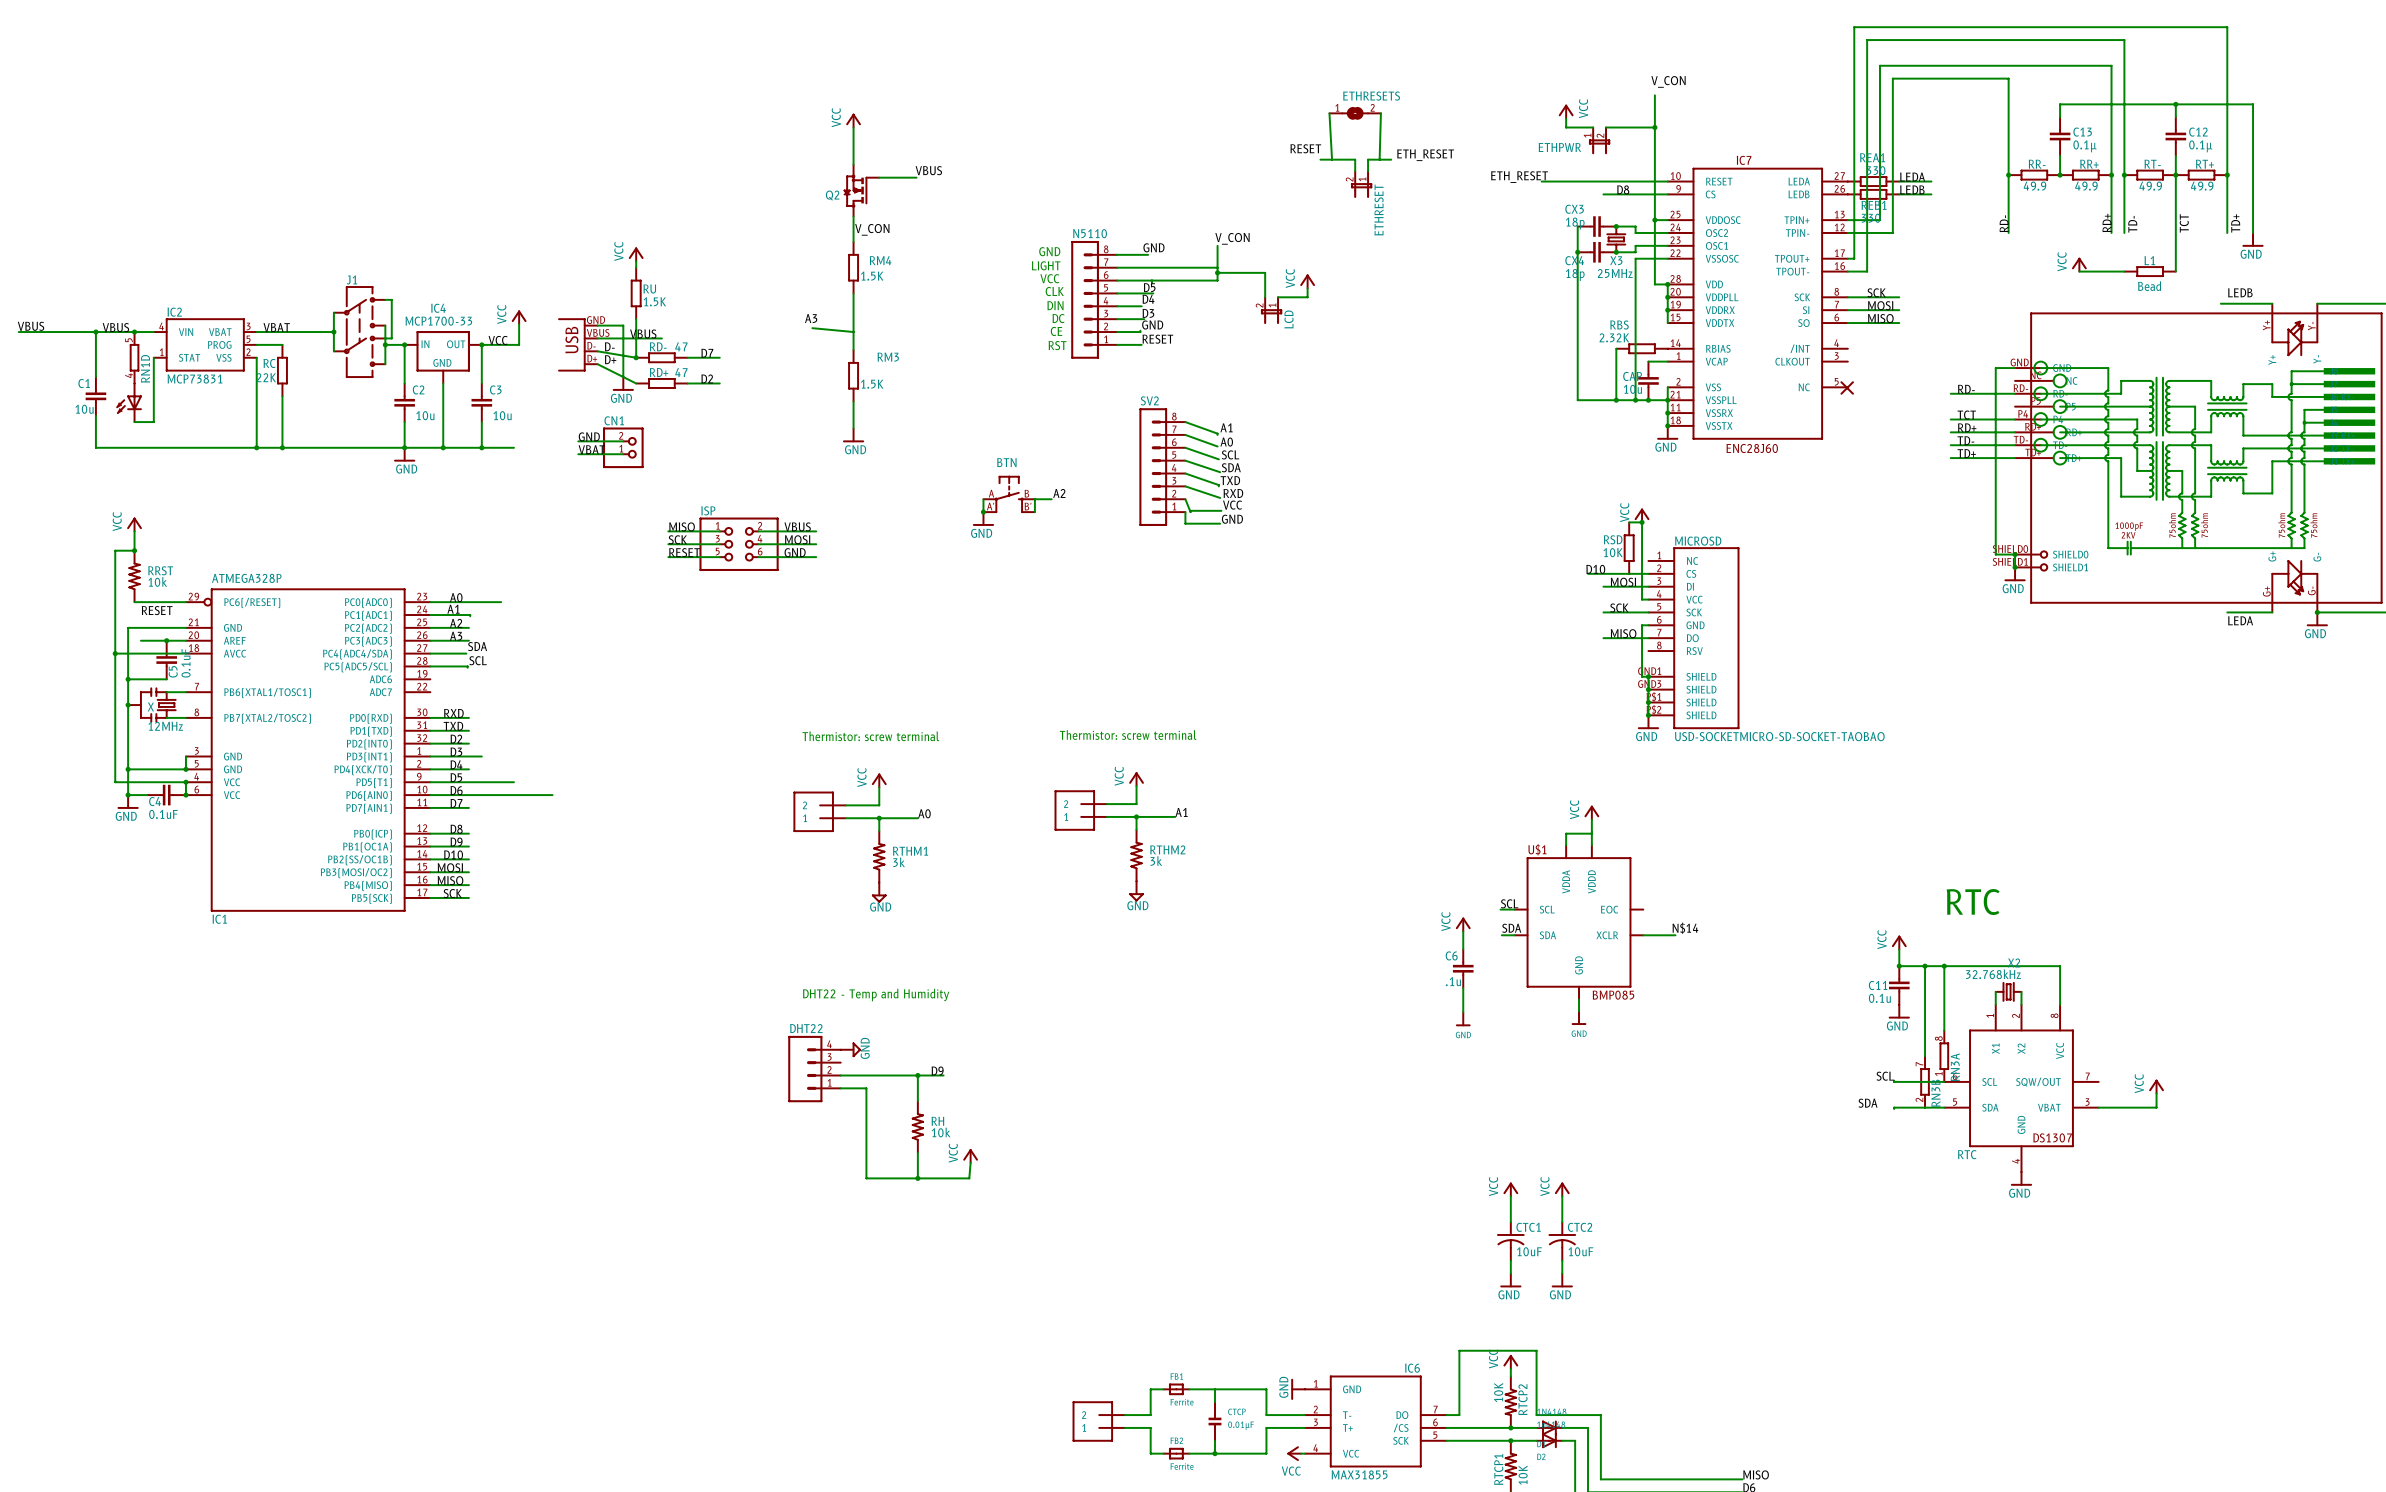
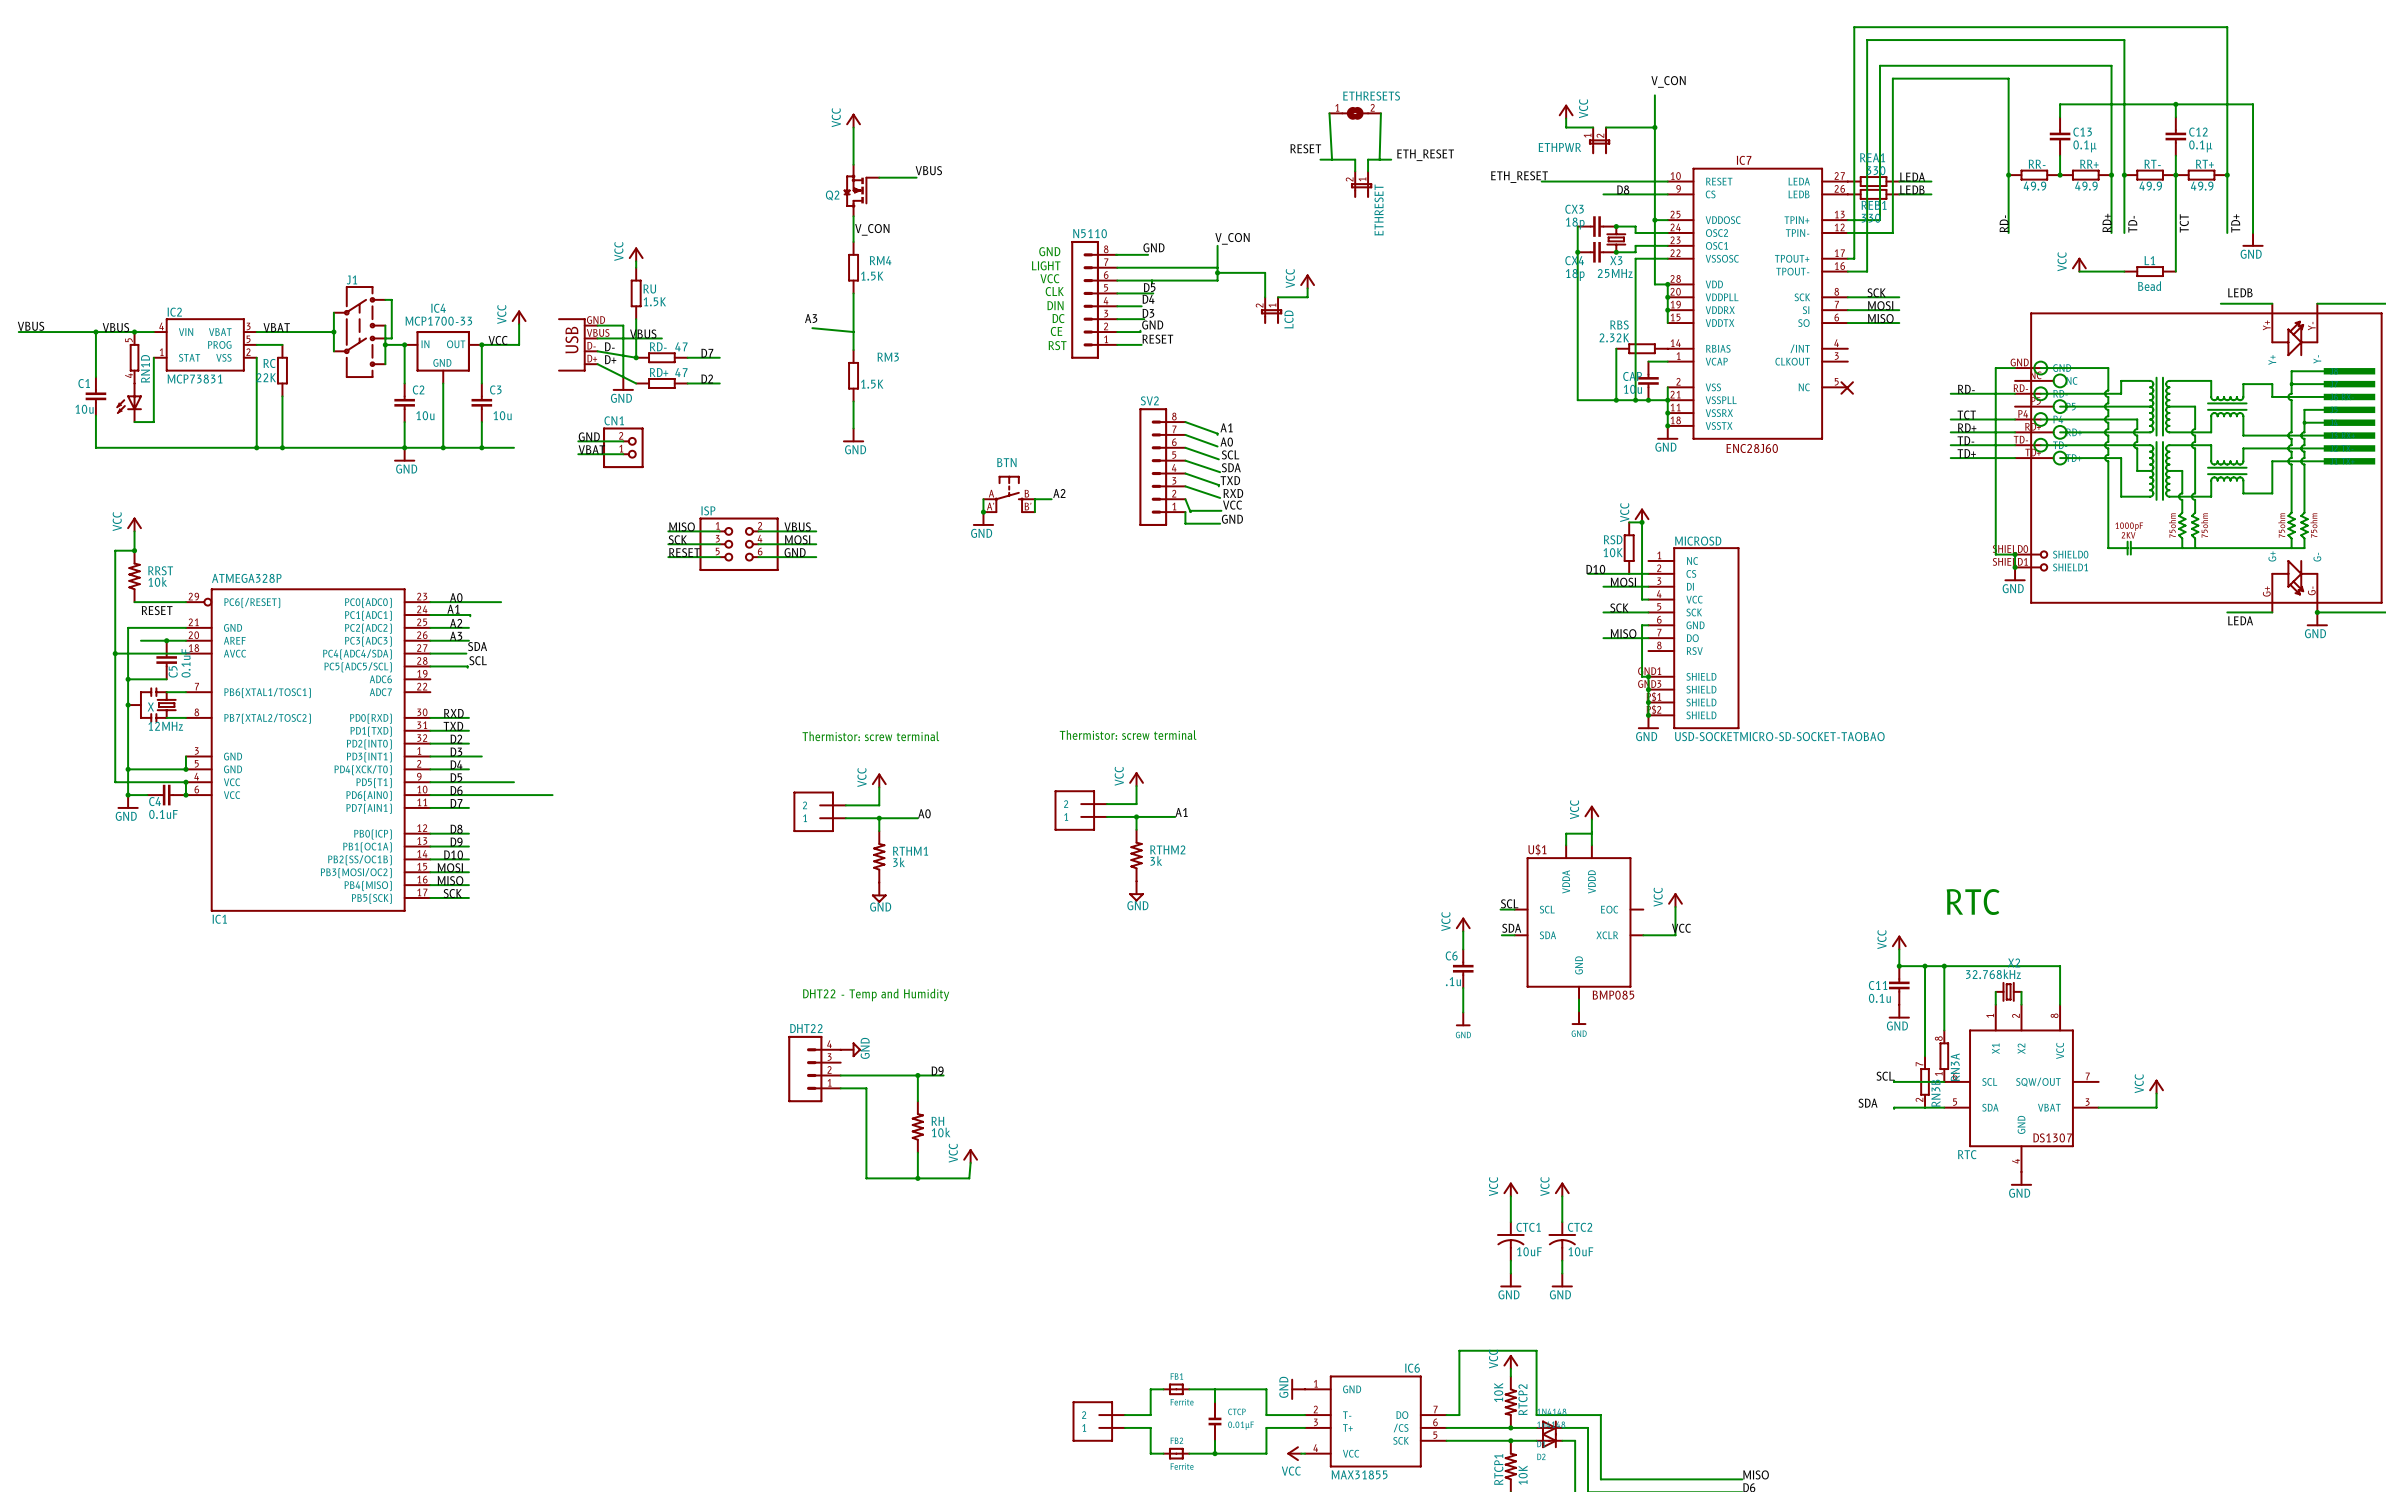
power symbol: none -> VCC (1675, 900)
wire: none -> (1675, 906) (1675, 935)
label: N$14 (1685, 928) -> VCC (1681, 928)

